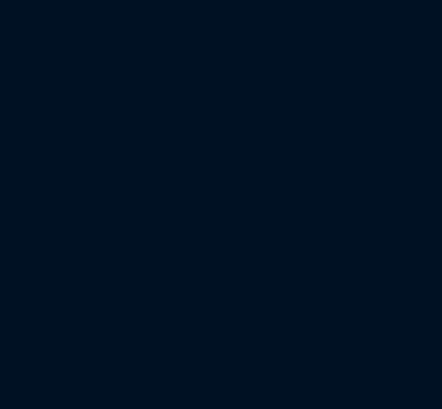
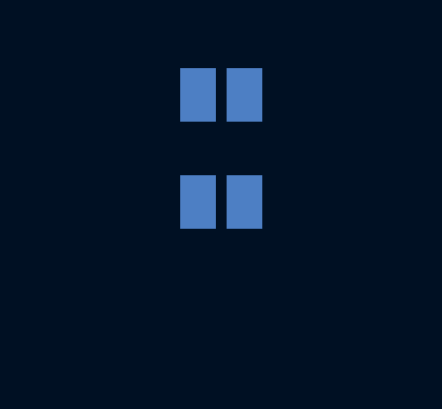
part: none -> (221, 94)
part: none -> (221, 201)

